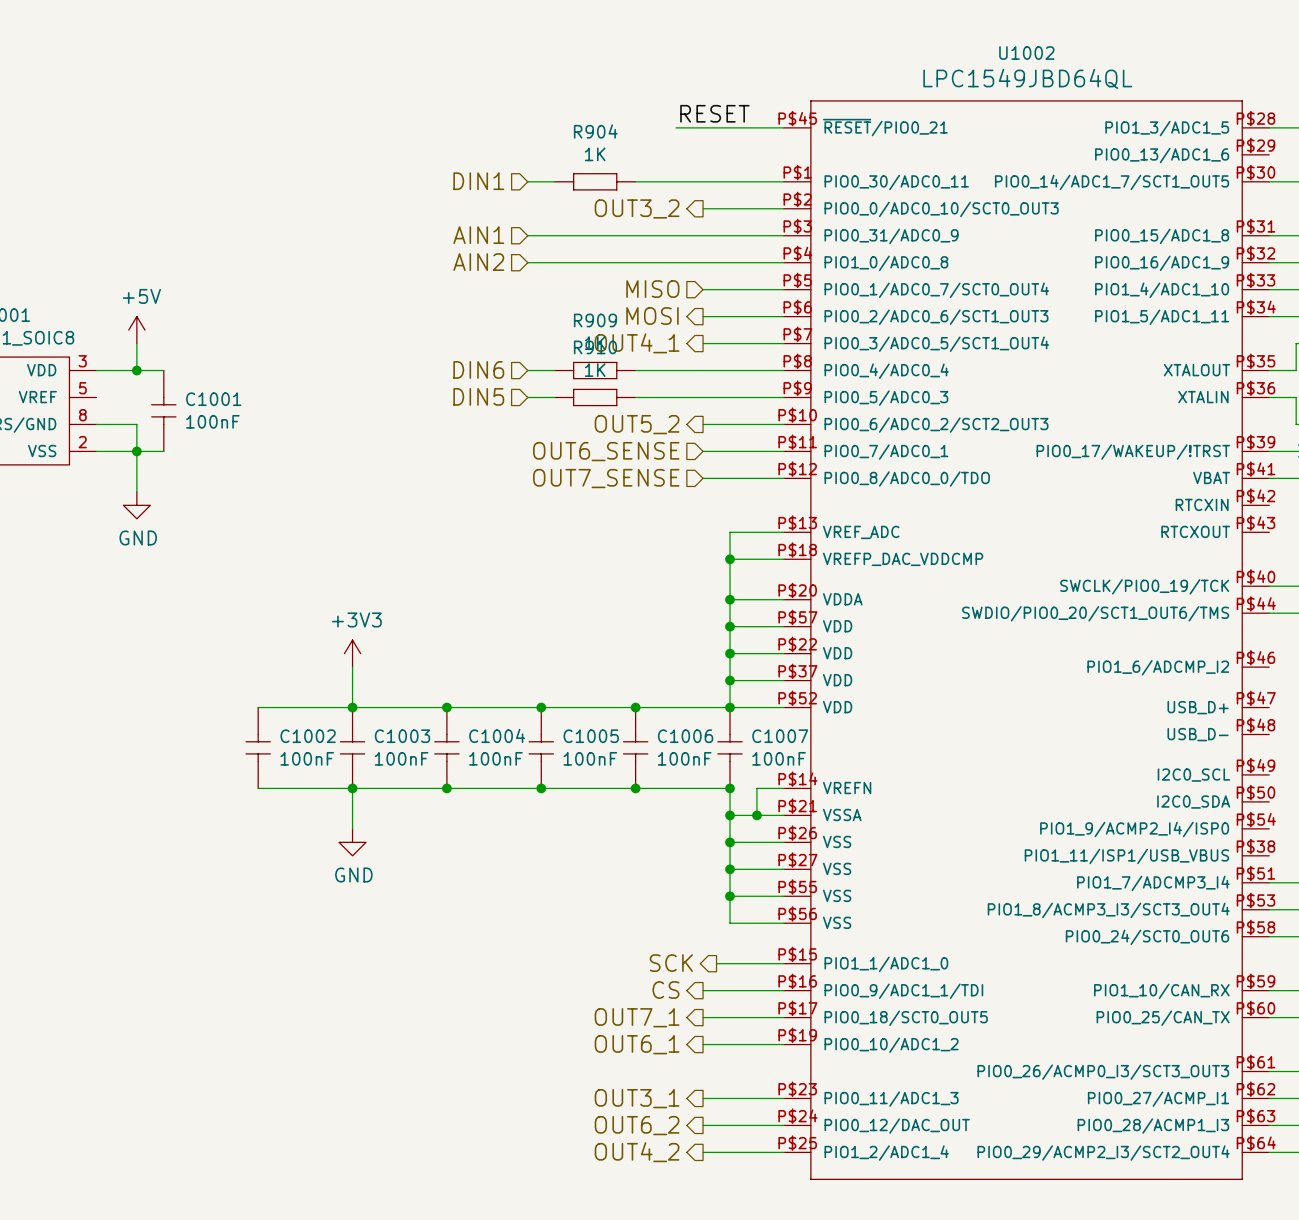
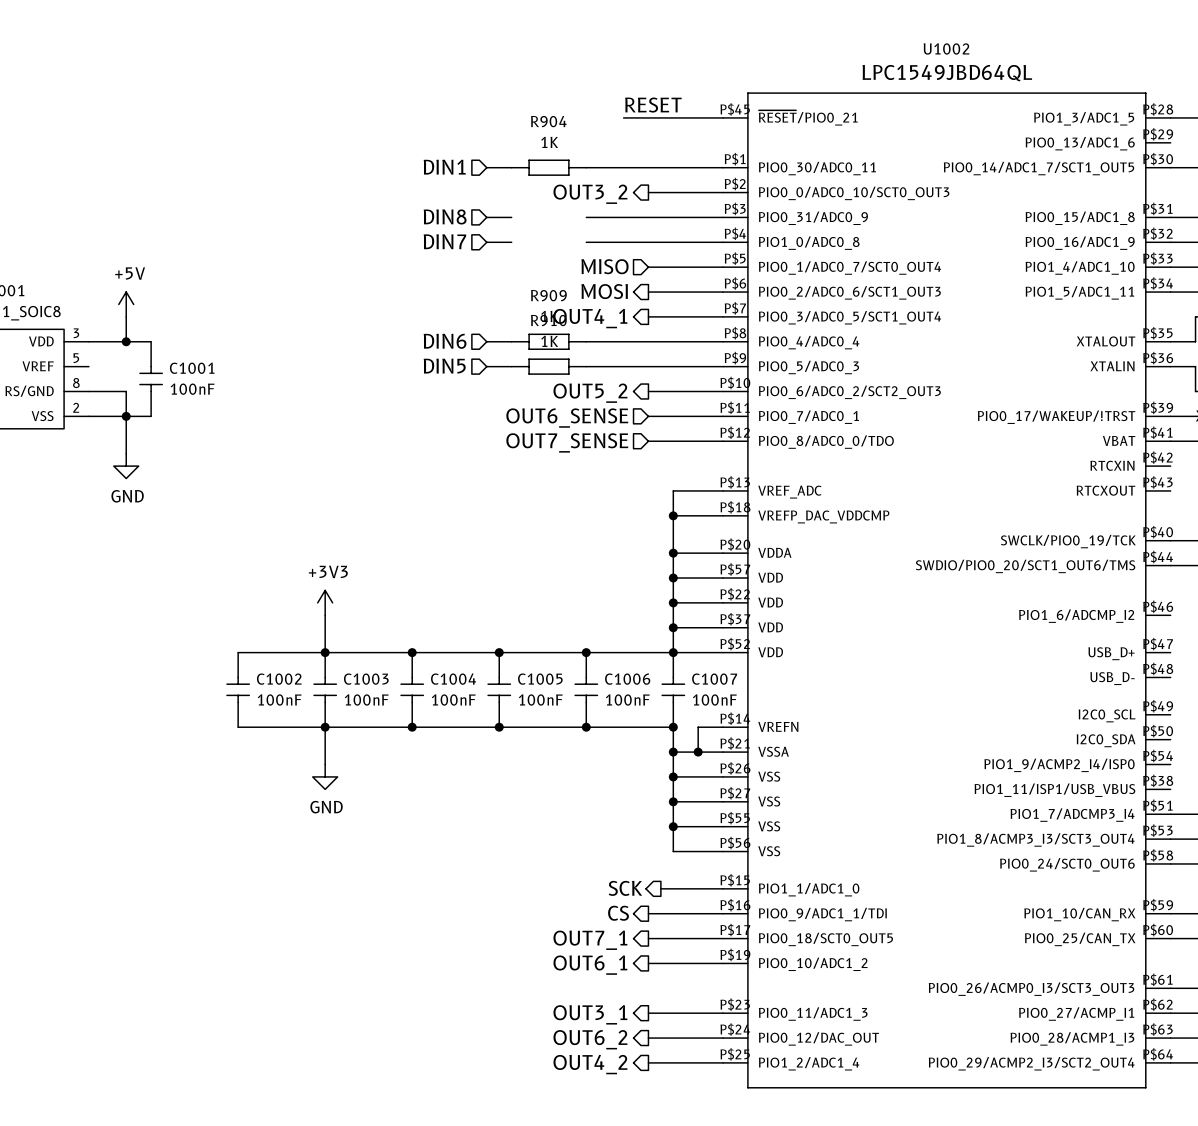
hierarchical label: AIN1 (478, 235) -> DIN8 (445, 216)
wire: (554, 235) (635, 235) -> none
hierarchical label: AIN2 (478, 262) -> DIN7 (444, 241)
wire: (554, 262) (635, 262) -> none

